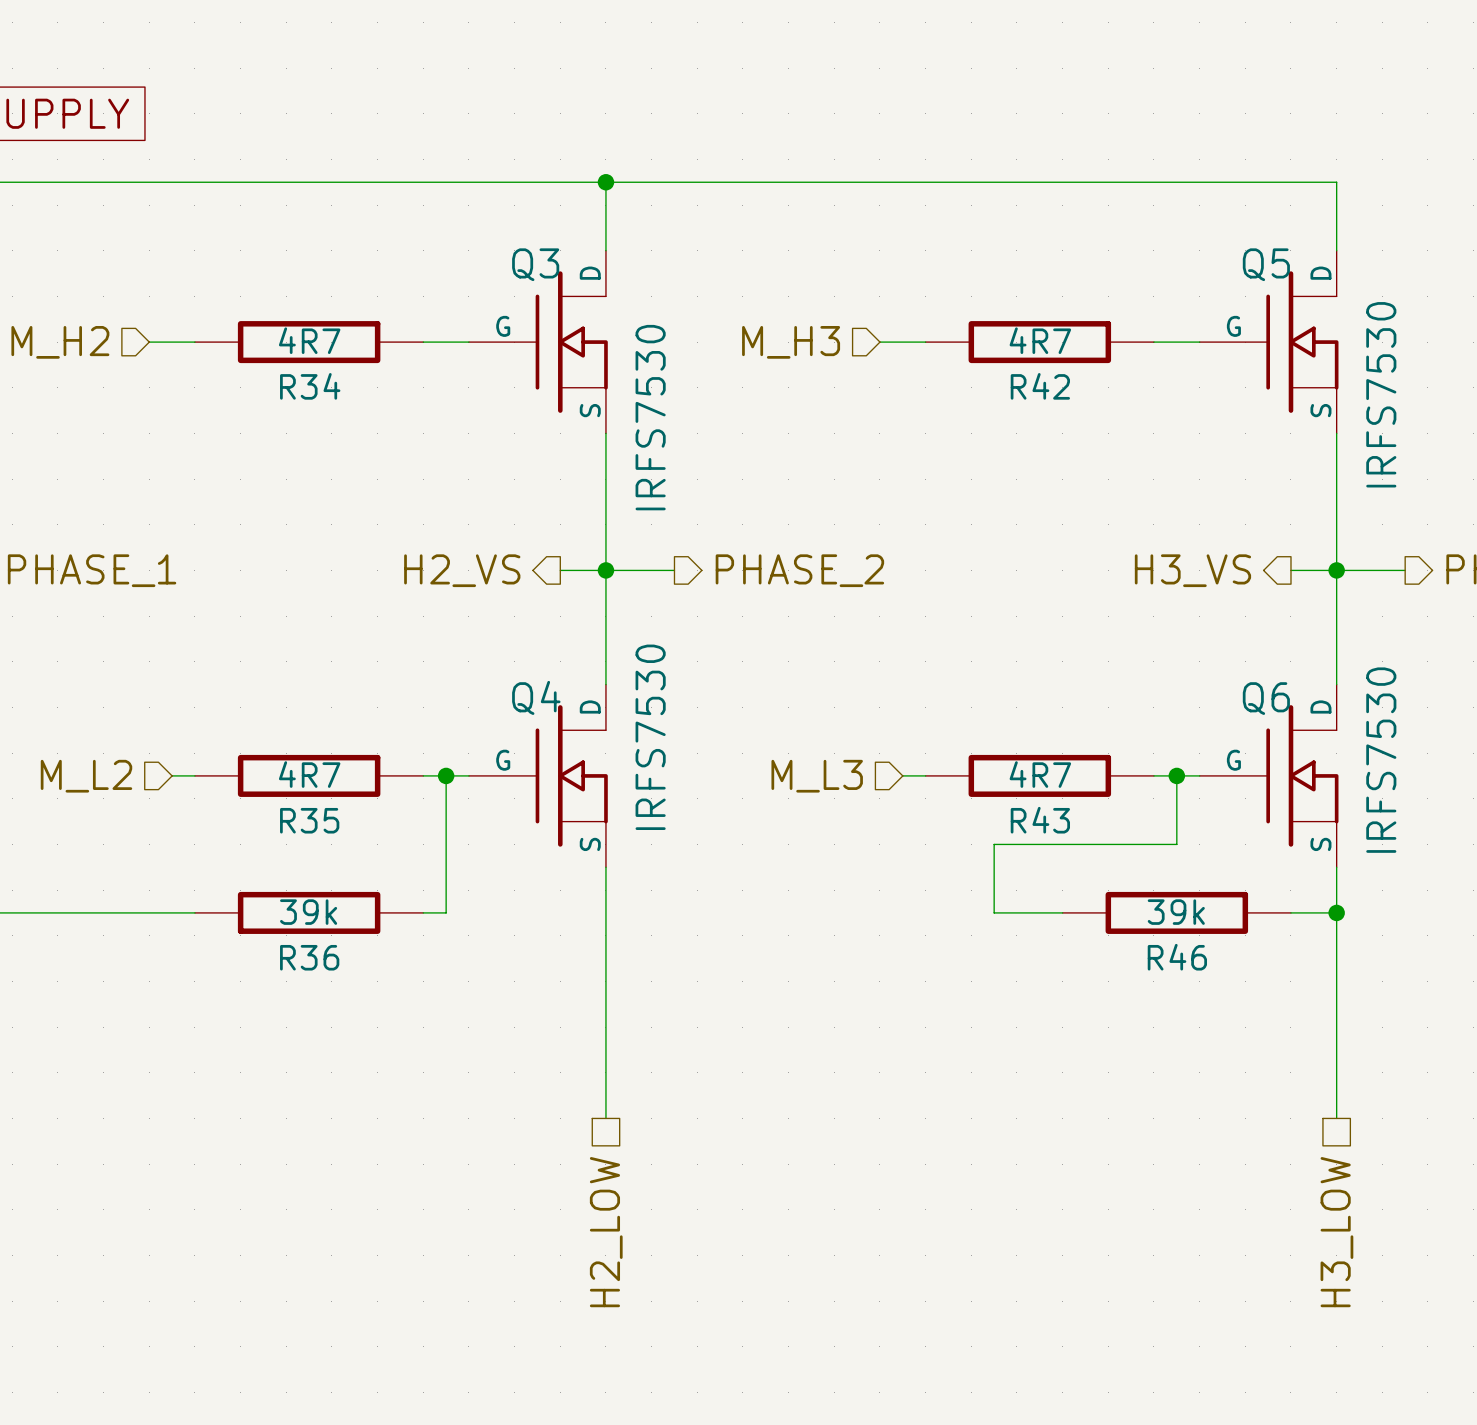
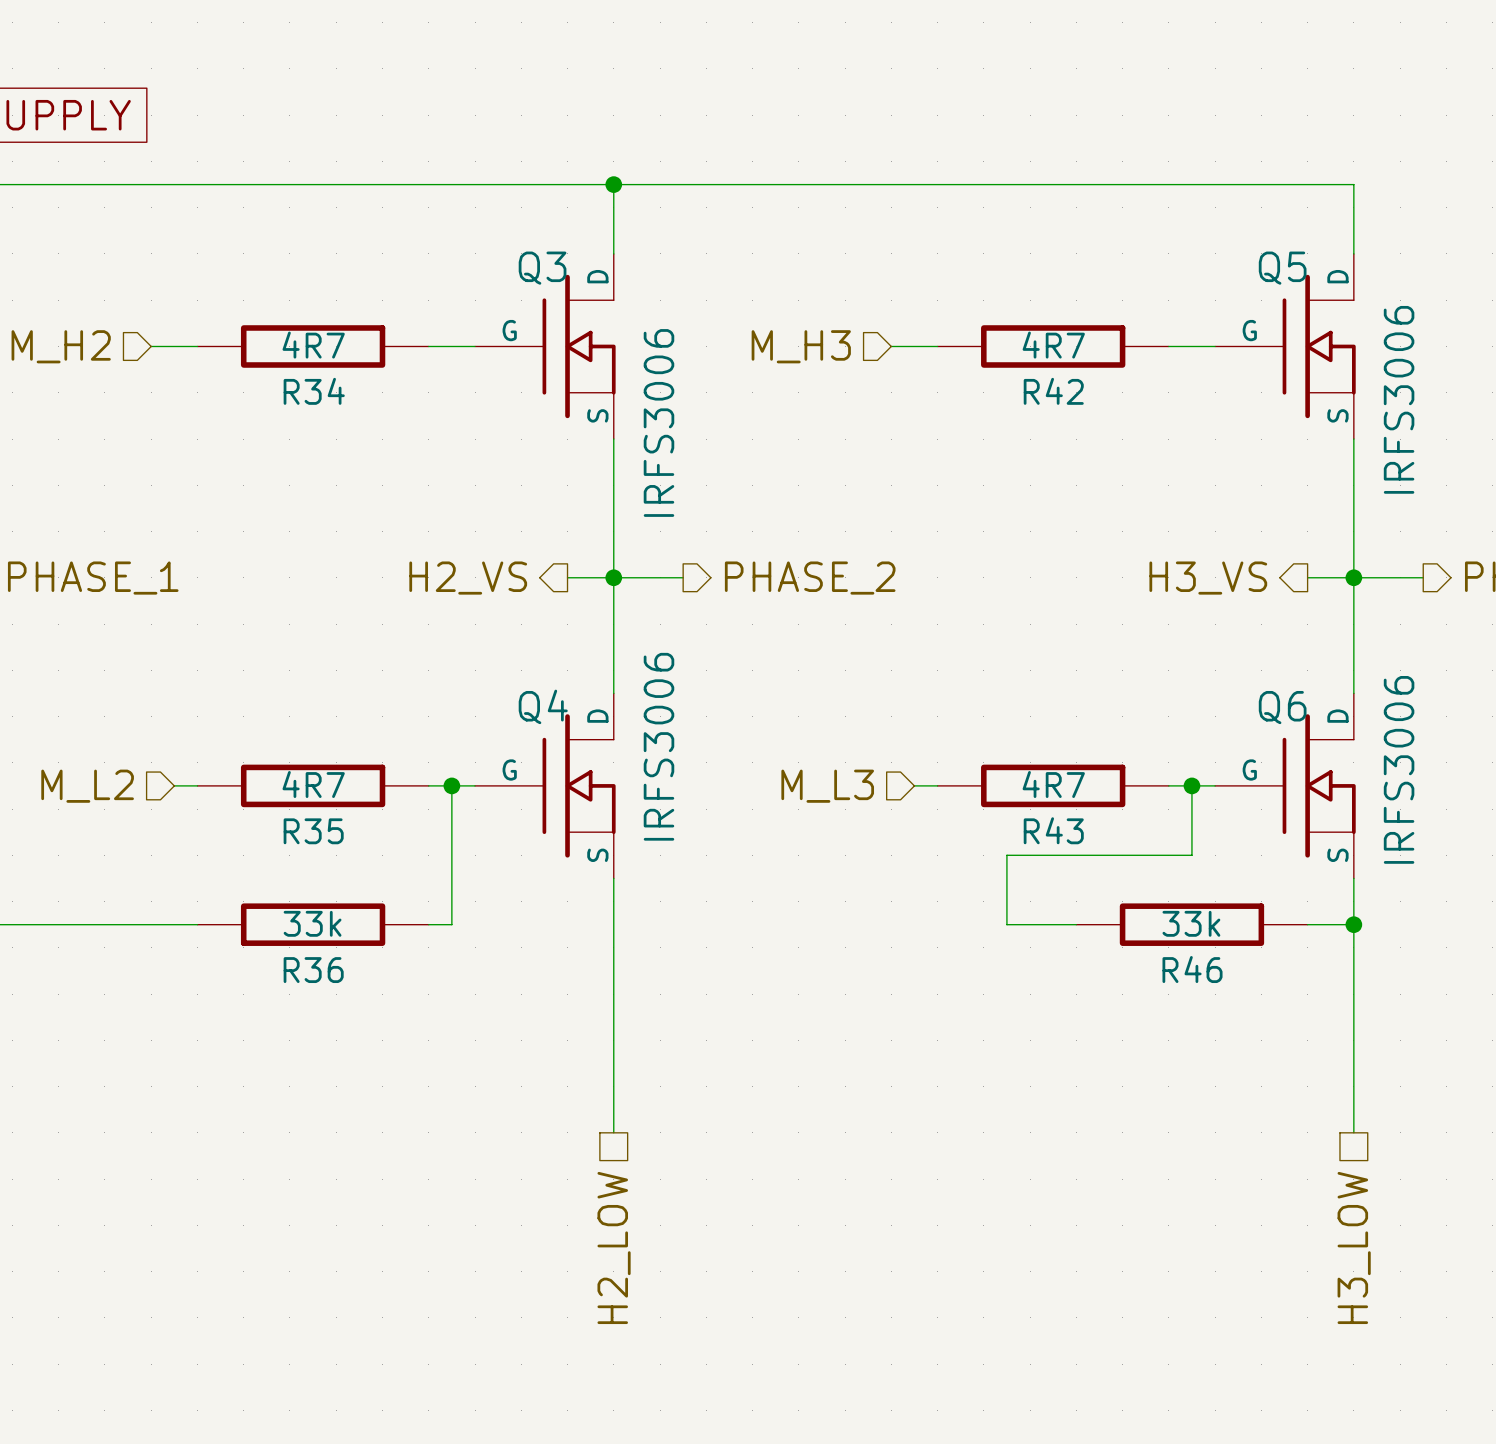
Q5 value: IRFS7530 (1381, 394) -> IRFS3006 (1399, 399)
Q3 value: IRFS7530 (650, 417) -> IRFS3006 (658, 422)
Q4 value: IRFS7530 (650, 737) -> IRFS3006 (658, 746)
Q6 value: IRFS7530 (1381, 760) -> IRFS3006 (1399, 769)
R36 value: 39k (308, 912) -> 33k (312, 923)
R46 value: 39k (1176, 912) -> 33k (1191, 923)

